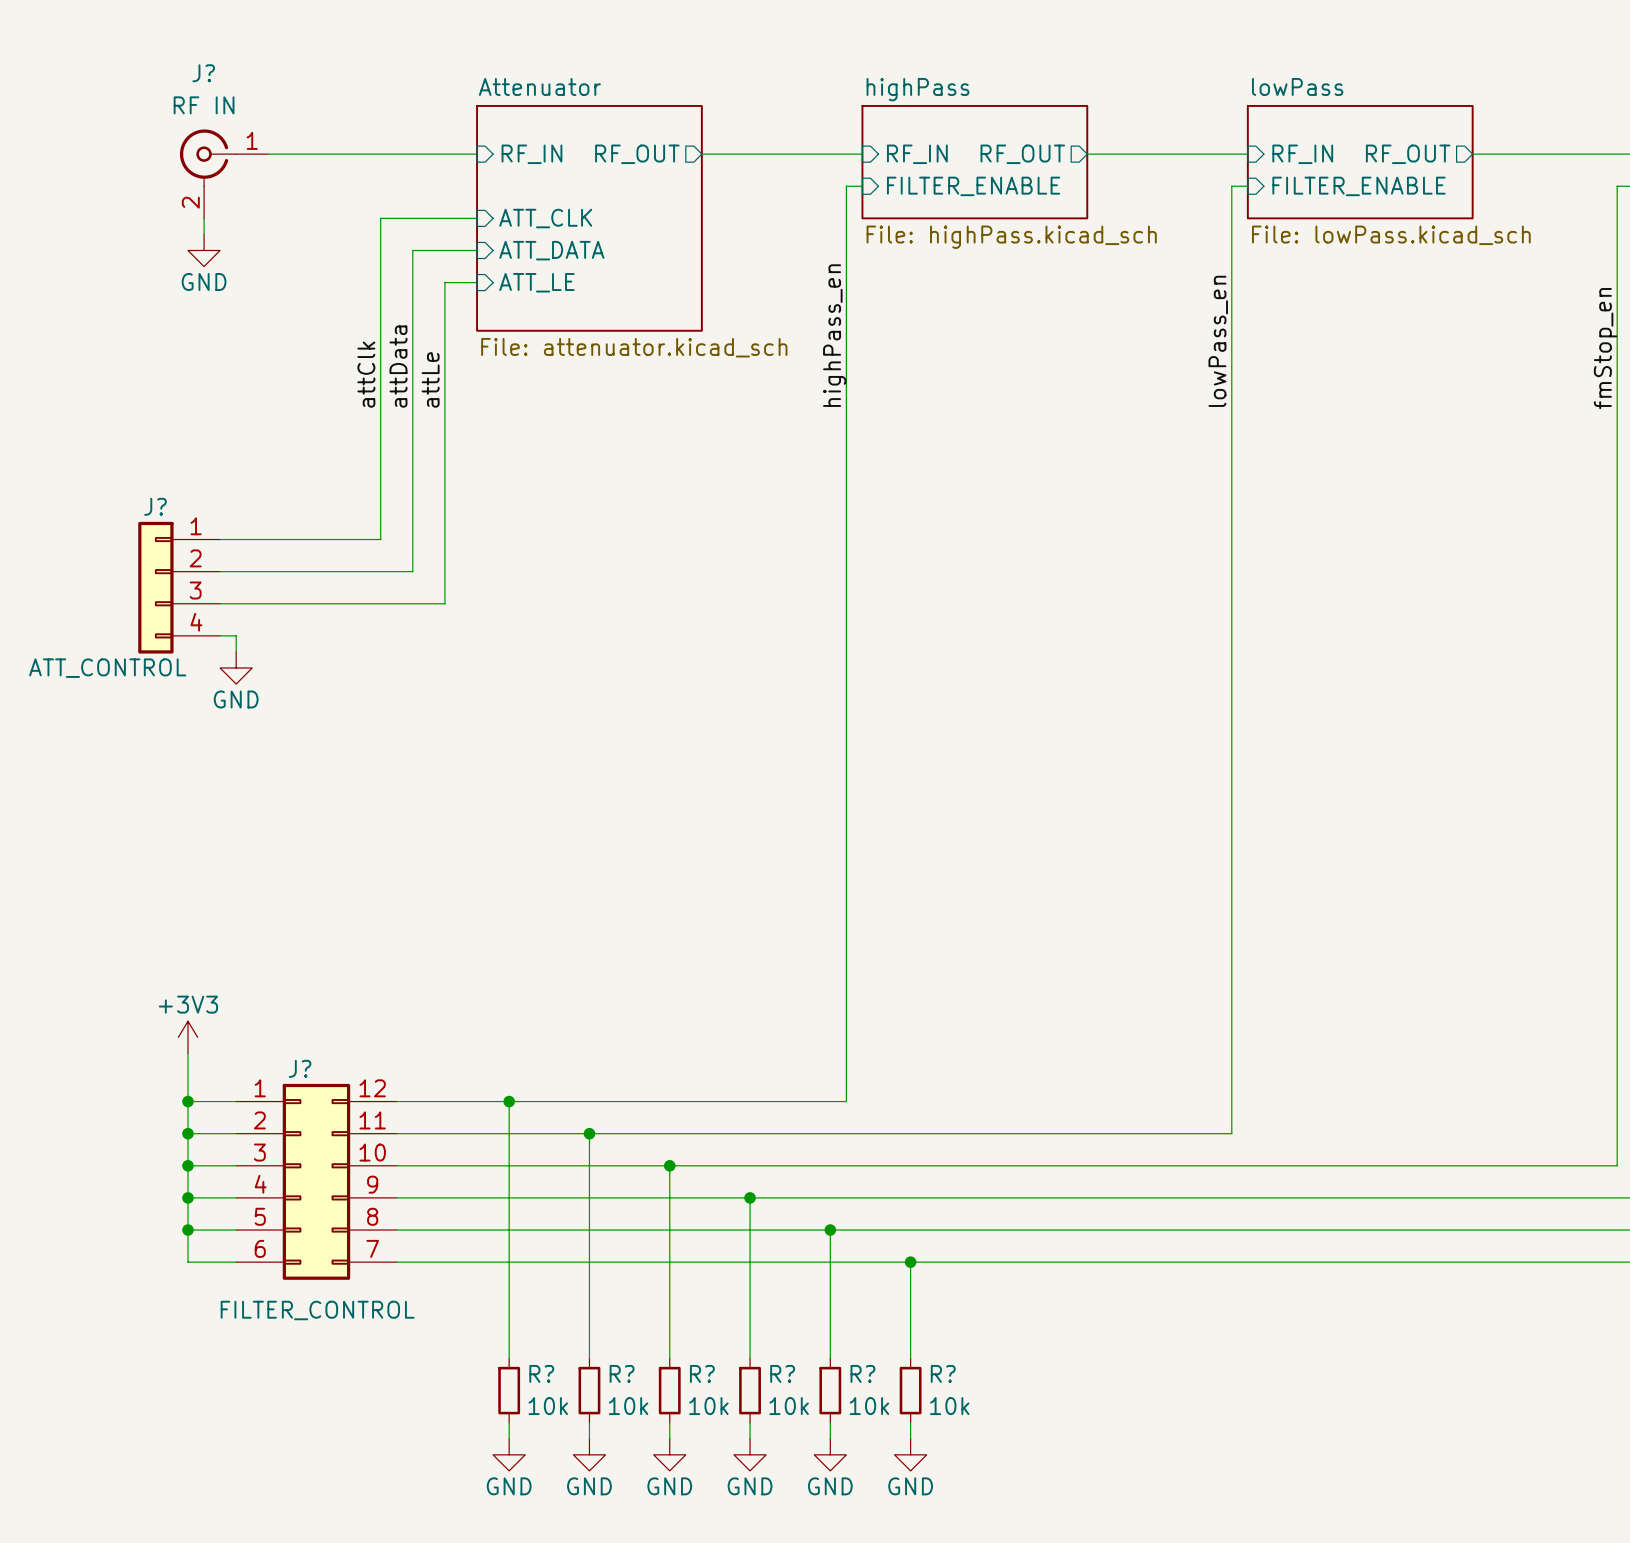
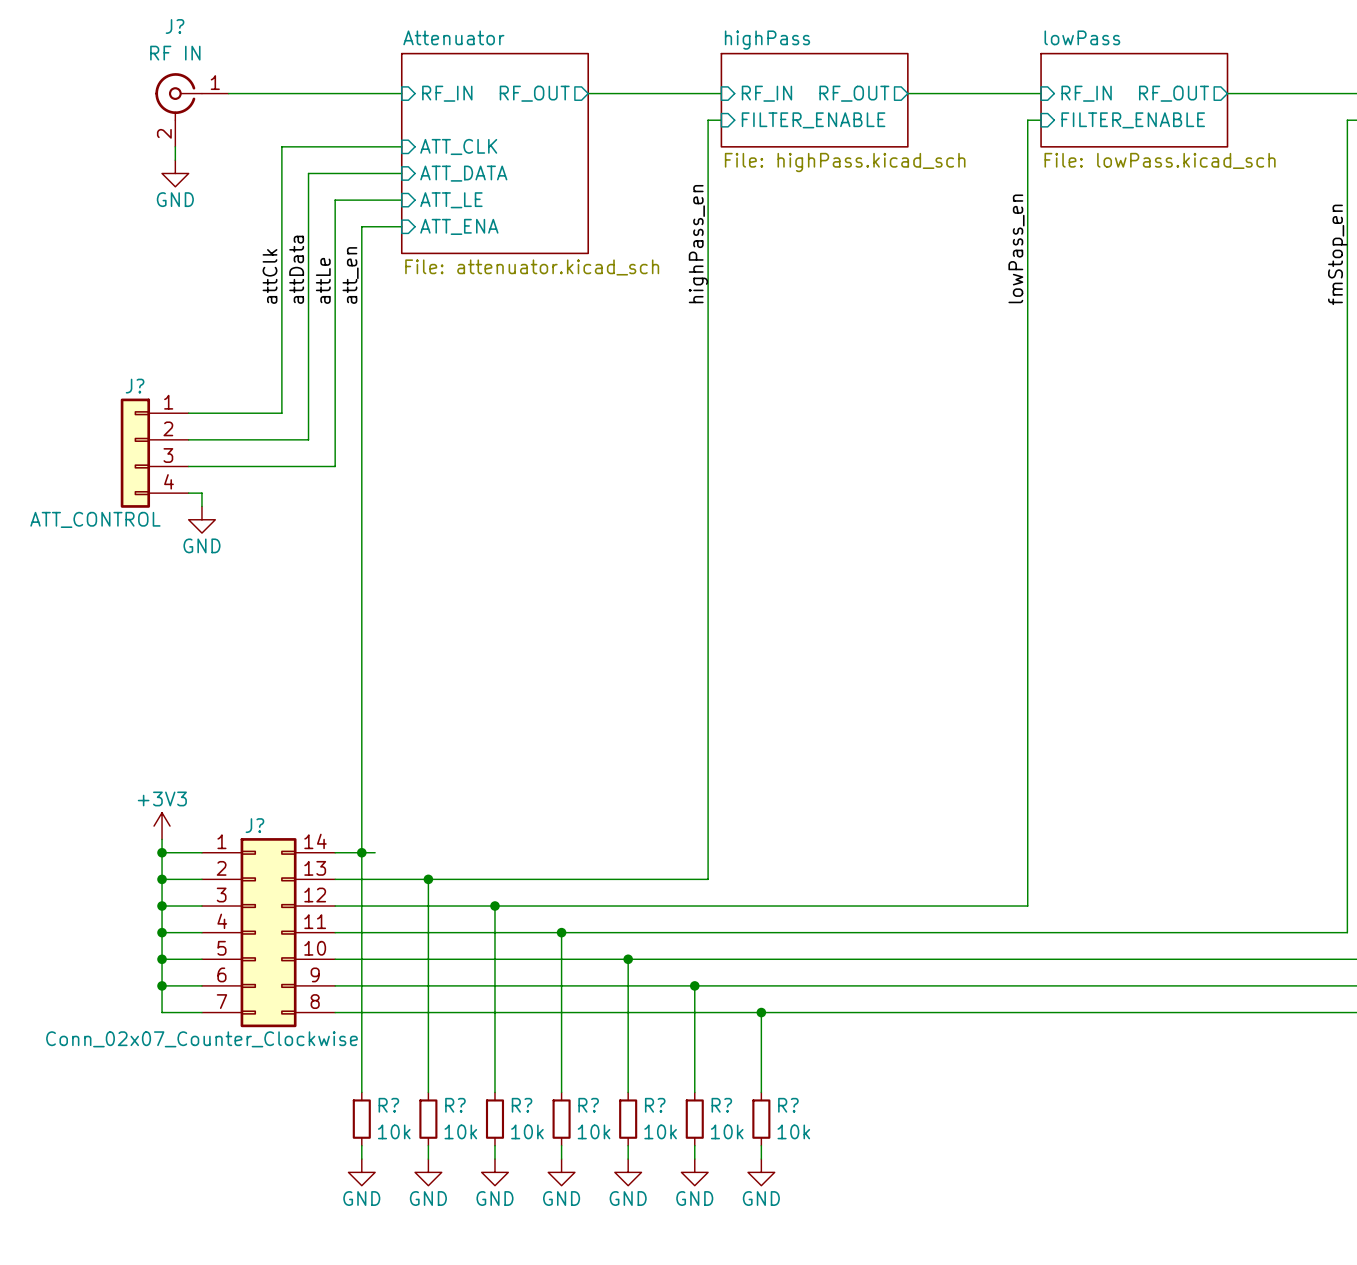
sheet Attenuator shape: [476, 104, 703, 332] -> [400, 52, 590, 255]
wire: (380, 218) (380, 539) (332, 539) -> (321, 146) (281, 146) (281, 413)
wire: (412, 250) (412, 571) (364, 571) -> (348, 173) (308, 173) (308, 439)
wire: (444, 282) (444, 603) (396, 603) -> (375, 200) (335, 200) (335, 466)
wire: none -> (401, 226) (361, 226) (361, 1092)
sheet pin: none -> ATT_ENA (459, 226)
label position: attData (398, 366) -> attData (296, 269)
label: none -> att_en (350, 275)
label position: attClk (366, 374) -> attClk (270, 276)
label position: attLe (430, 379) -> attLe (323, 280)
wire: none -> (162, 852) (201, 852)
junction: none -> (162, 852)
wire: none -> (335, 852) (375, 852)
junction: none -> (361, 852)
J?: none -> Conn_02x07_Counter_Clockwise (268, 932)
J?: FILTER_CONTROL (316, 1181) -> none
R?: none -> 10k (361, 1119)
wire: none -> (361, 1145) (361, 1159)
power symbol: none -> GND (361, 1172)

